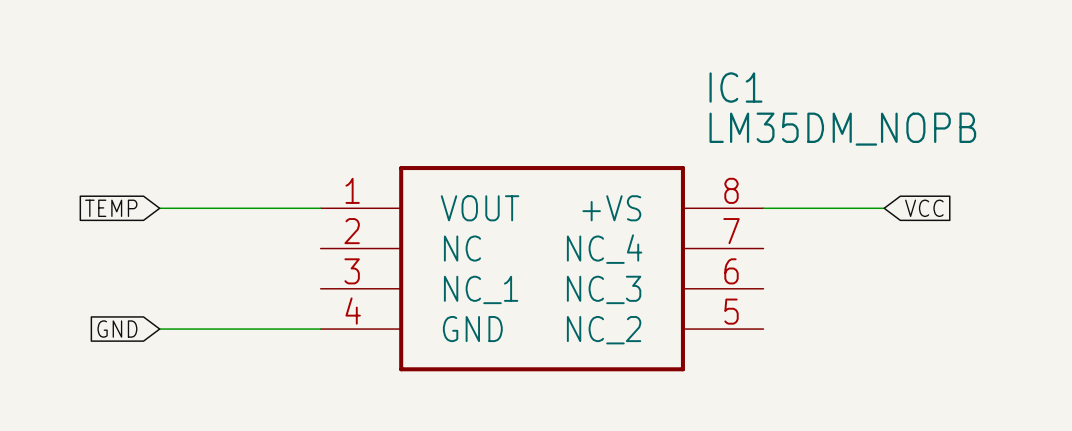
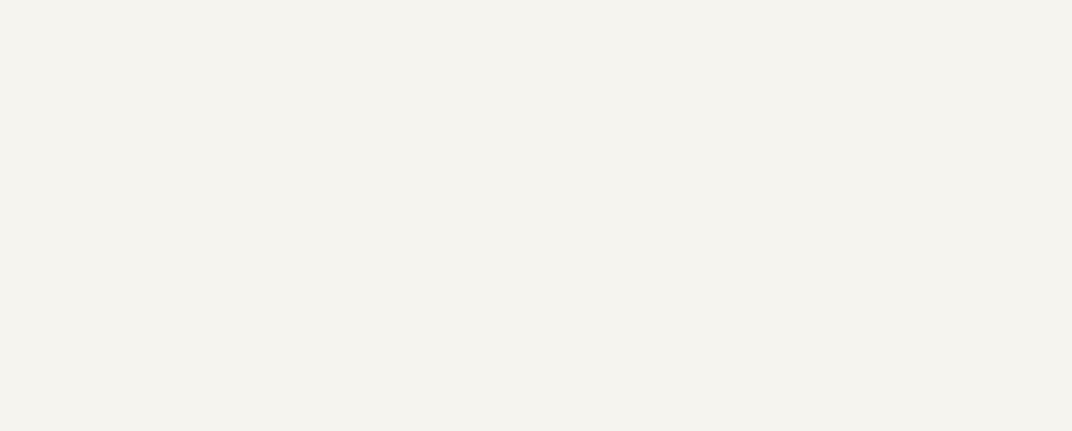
global label: TEMP (111, 208) -> none
wire: (159, 208) (320, 208) -> none
wire: (763, 208) (884, 208) -> none
global label: VCC (924, 208) -> none
IC1: LM35DM_NOPB (542, 268) -> none
global label: GND (117, 329) -> none
wire: (159, 329) (320, 329) -> none

